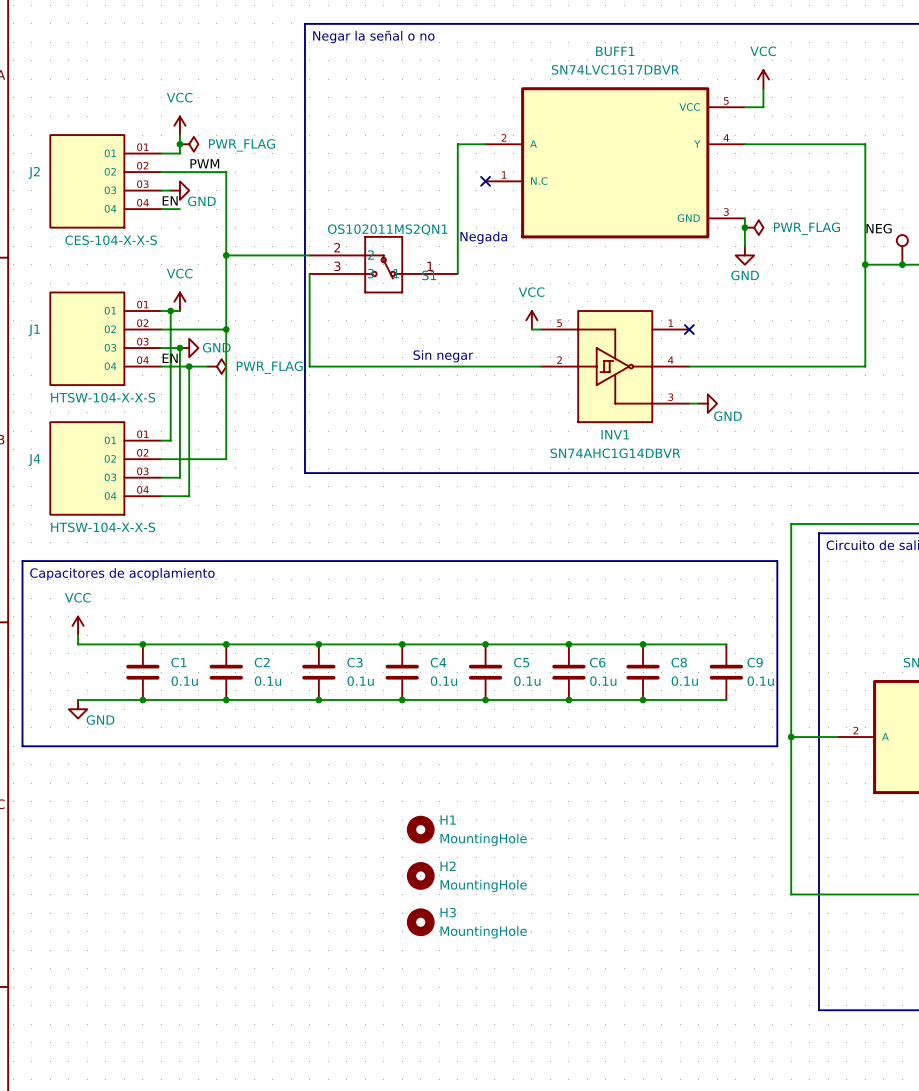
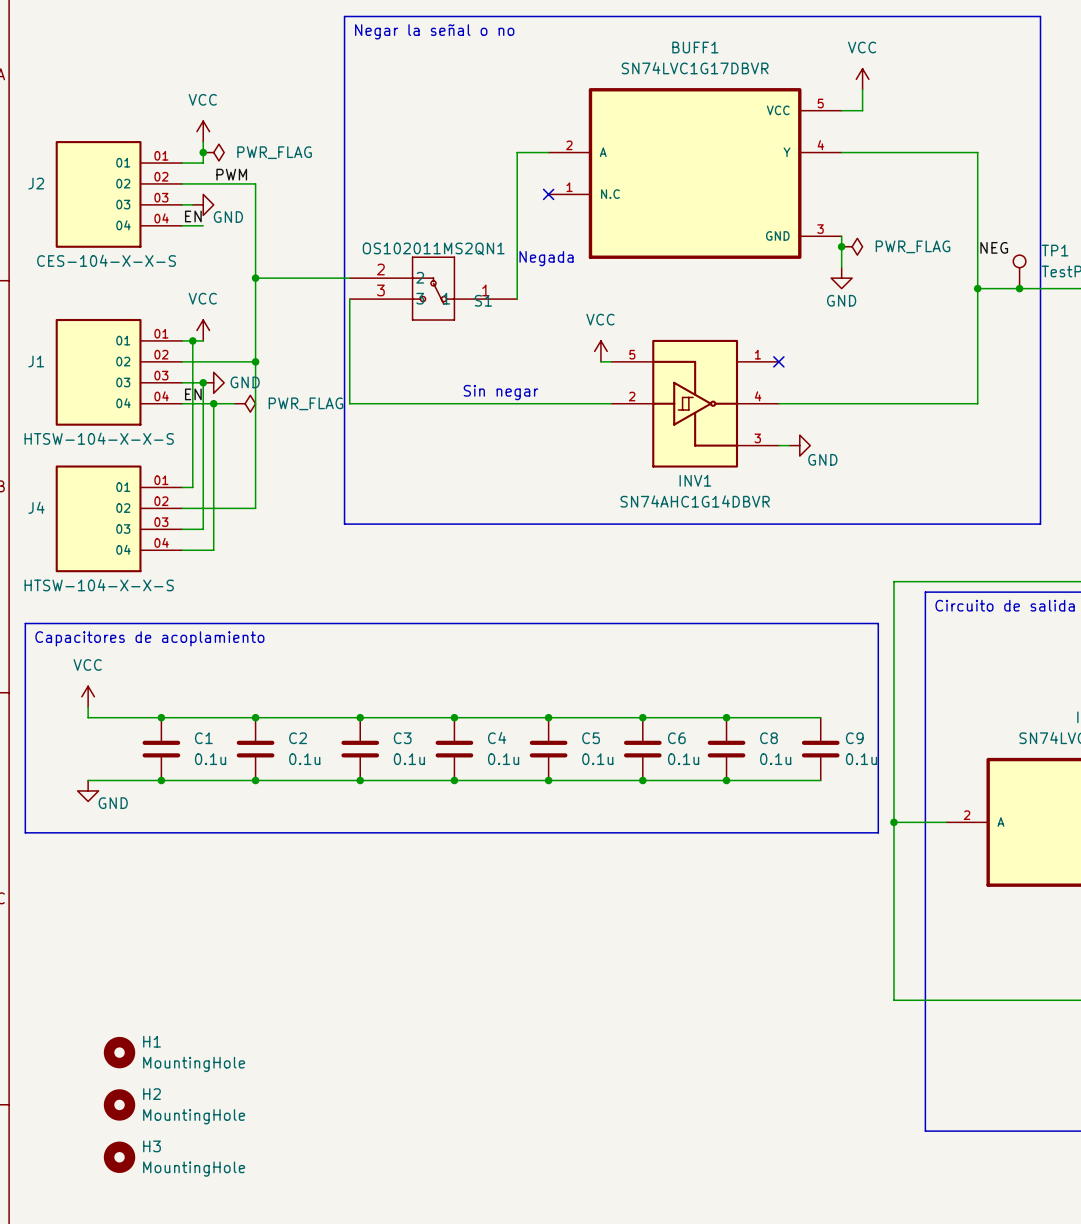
H1 position: (420, 829) -> (119, 1052)
H2 position: (420, 875) -> (119, 1104)
H3 position: (420, 922) -> (119, 1157)

